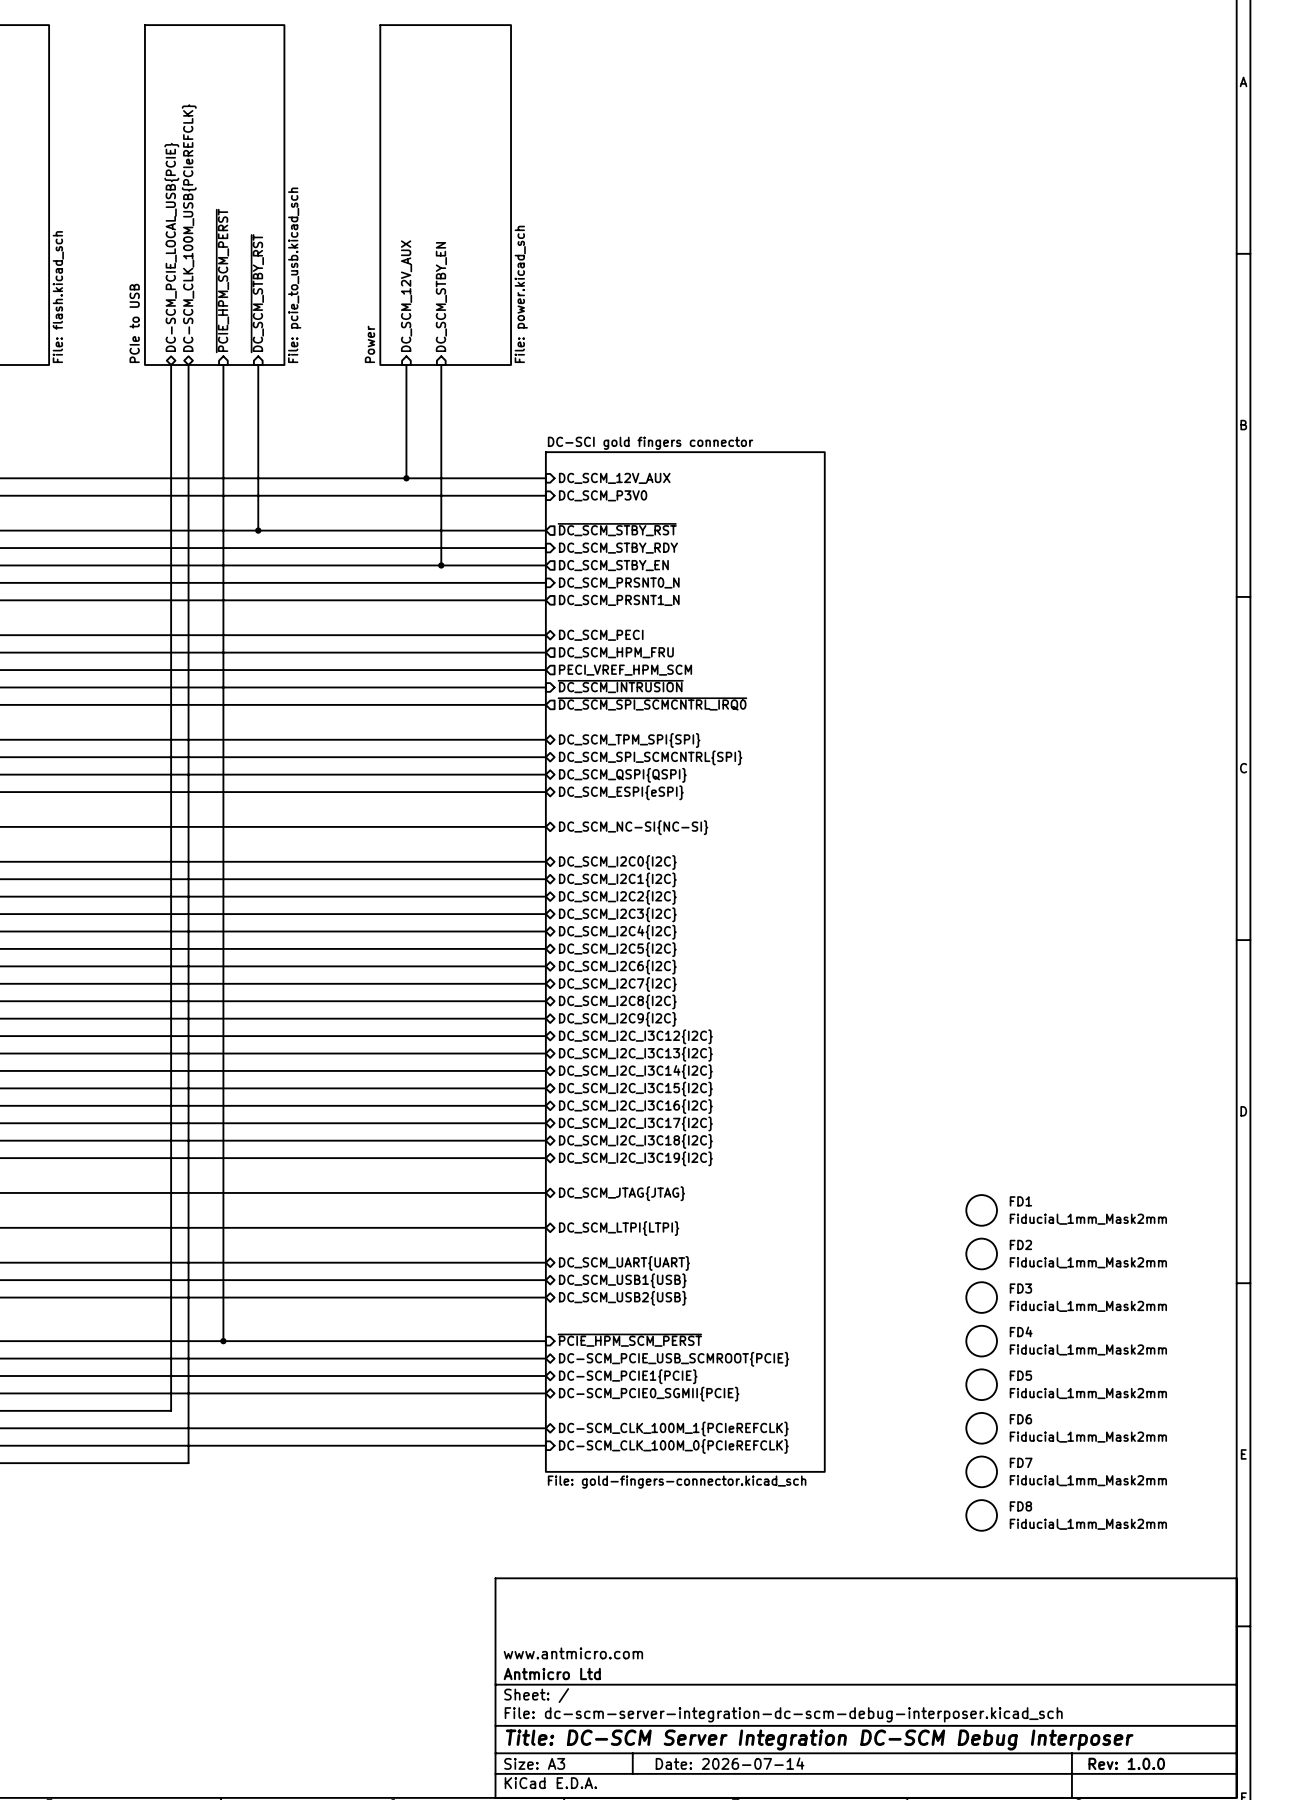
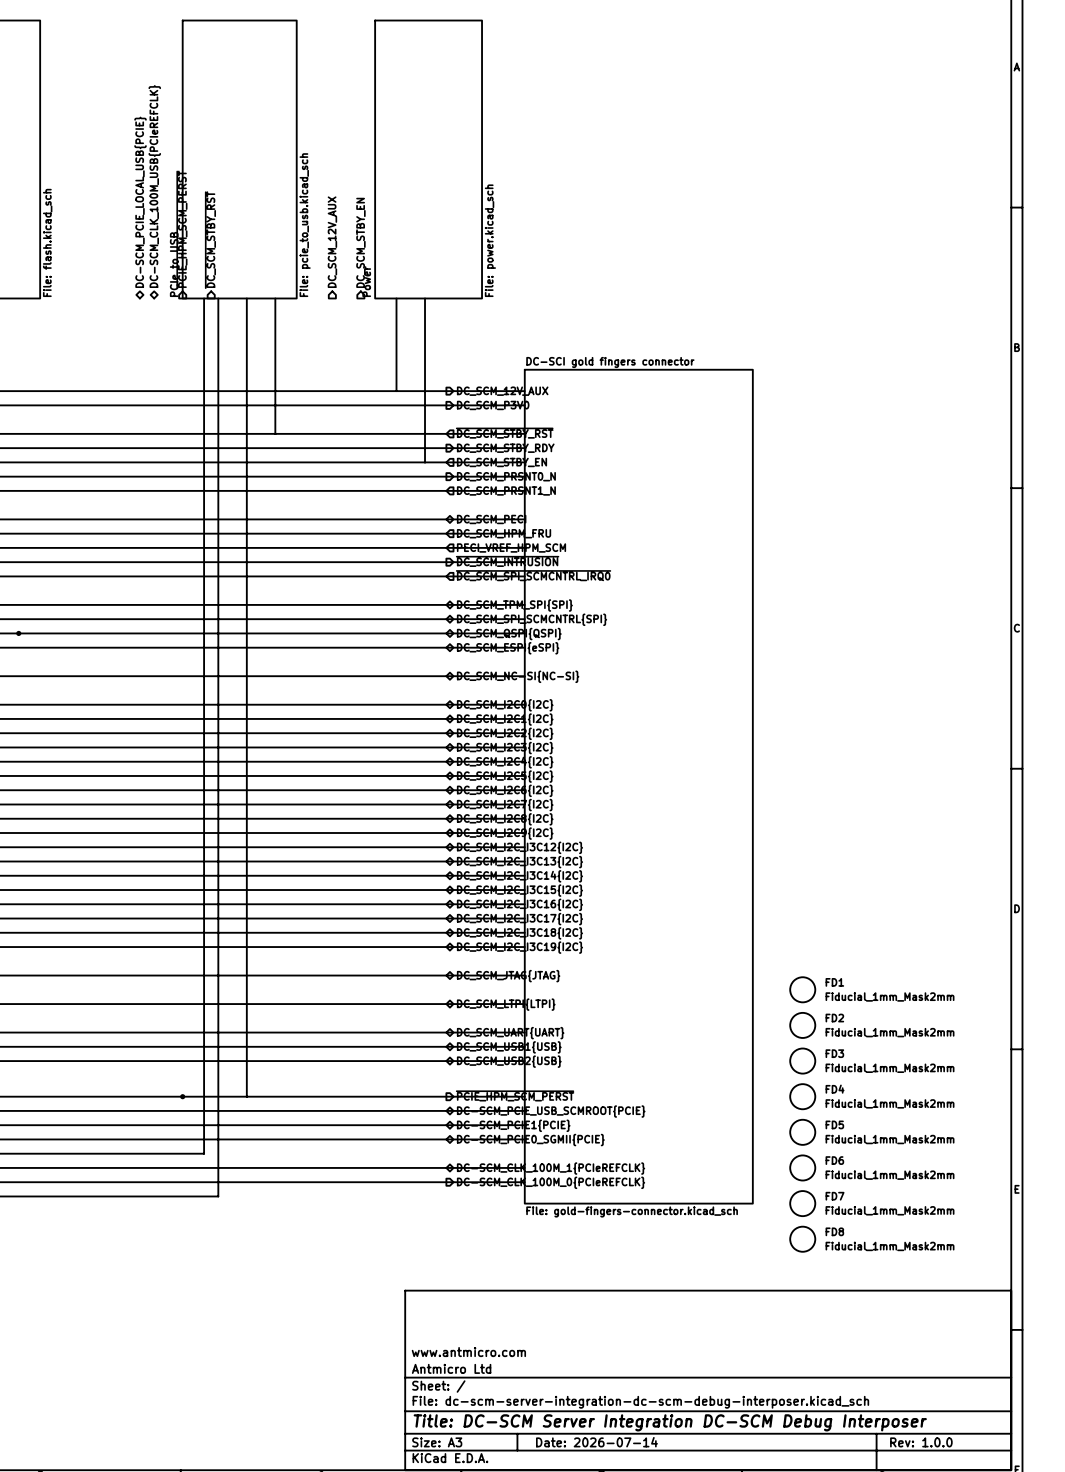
sheet PCIe to USB position: (214, 195) -> (239, 159)
sheet Power position: (445, 195) -> (428, 159)
bus: (171, 365) (171, 1410) -> (204, 298) (204, 1153) (139, 1153)
bus: (188, 365) (188, 1463) -> (218, 298) (218, 1196) (154, 1196)
wire: (223, 365) (223, 1341) -> (246, 298) (246, 1096)
wire: (258, 365) (258, 530) -> (275, 298) (275, 433)
wire: (406, 365) (406, 478) -> (396, 298) (396, 391)
wire: (441, 365) (441, 565) -> (425, 298) (425, 462)
junction: (406, 478) -> none
wire: none -> (446, 391) (524, 391)
wire: none -> (446, 405) (524, 405)
junction: (258, 530) -> none
wire: none -> (446, 433) (524, 433)
wire: none -> (446, 448) (524, 448)
junction: (441, 565) -> none
wire: none -> (446, 462) (524, 462)
wire: none -> (446, 476) (524, 476)
wire: none -> (446, 490) (524, 490)
wire: none -> (446, 519) (524, 519)
wire: none -> (446, 533) (524, 533)
wire: none -> (446, 547) (524, 547)
wire: none -> (446, 562) (524, 562)
wire: none -> (446, 576) (524, 576)
bus: none -> (446, 604) (524, 604)
bus: none -> (446, 619) (524, 619)
junction: none -> (18, 633)
bus: none -> (446, 633) (524, 633)
bus: none -> (446, 647) (524, 647)
bus: none -> (446, 676) (524, 676)
bus: none -> (446, 704) (524, 704)
bus: none -> (446, 718) (524, 718)
bus: none -> (446, 733) (524, 733)
bus: none -> (446, 747) (524, 747)
bus: none -> (446, 761) (524, 761)
bus: none -> (446, 775) (524, 775)
sheet DC-SCI gold fingers connector position: (685, 962) -> (638, 786)
bus: none -> (446, 790) (524, 790)
bus: none -> (446, 804) (524, 804)
bus: none -> (446, 818) (524, 818)
bus: none -> (446, 833) (524, 833)
bus: none -> (446, 847) (524, 847)
bus: none -> (446, 861) (524, 861)
bus: none -> (446, 875) (524, 875)
bus: none -> (446, 890) (524, 890)
bus: none -> (446, 904) (524, 904)
bus: none -> (446, 918) (524, 918)
bus: none -> (446, 932) (524, 932)
bus: none -> (446, 947) (524, 947)
bus: none -> (446, 975) (524, 975)
bus: none -> (446, 1004) (524, 1004)
bus: none -> (446, 1032) (524, 1032)
bus: none -> (446, 1046) (524, 1046)
bus: none -> (446, 1061) (524, 1061)
wire: none -> (446, 1096) (524, 1096)
bus: none -> (446, 1110) (524, 1110)
bus: none -> (446, 1125) (524, 1125)
bus: none -> (446, 1139) (524, 1139)
bus: none -> (446, 1167) (524, 1167)
bus: none -> (446, 1182) (524, 1182)

